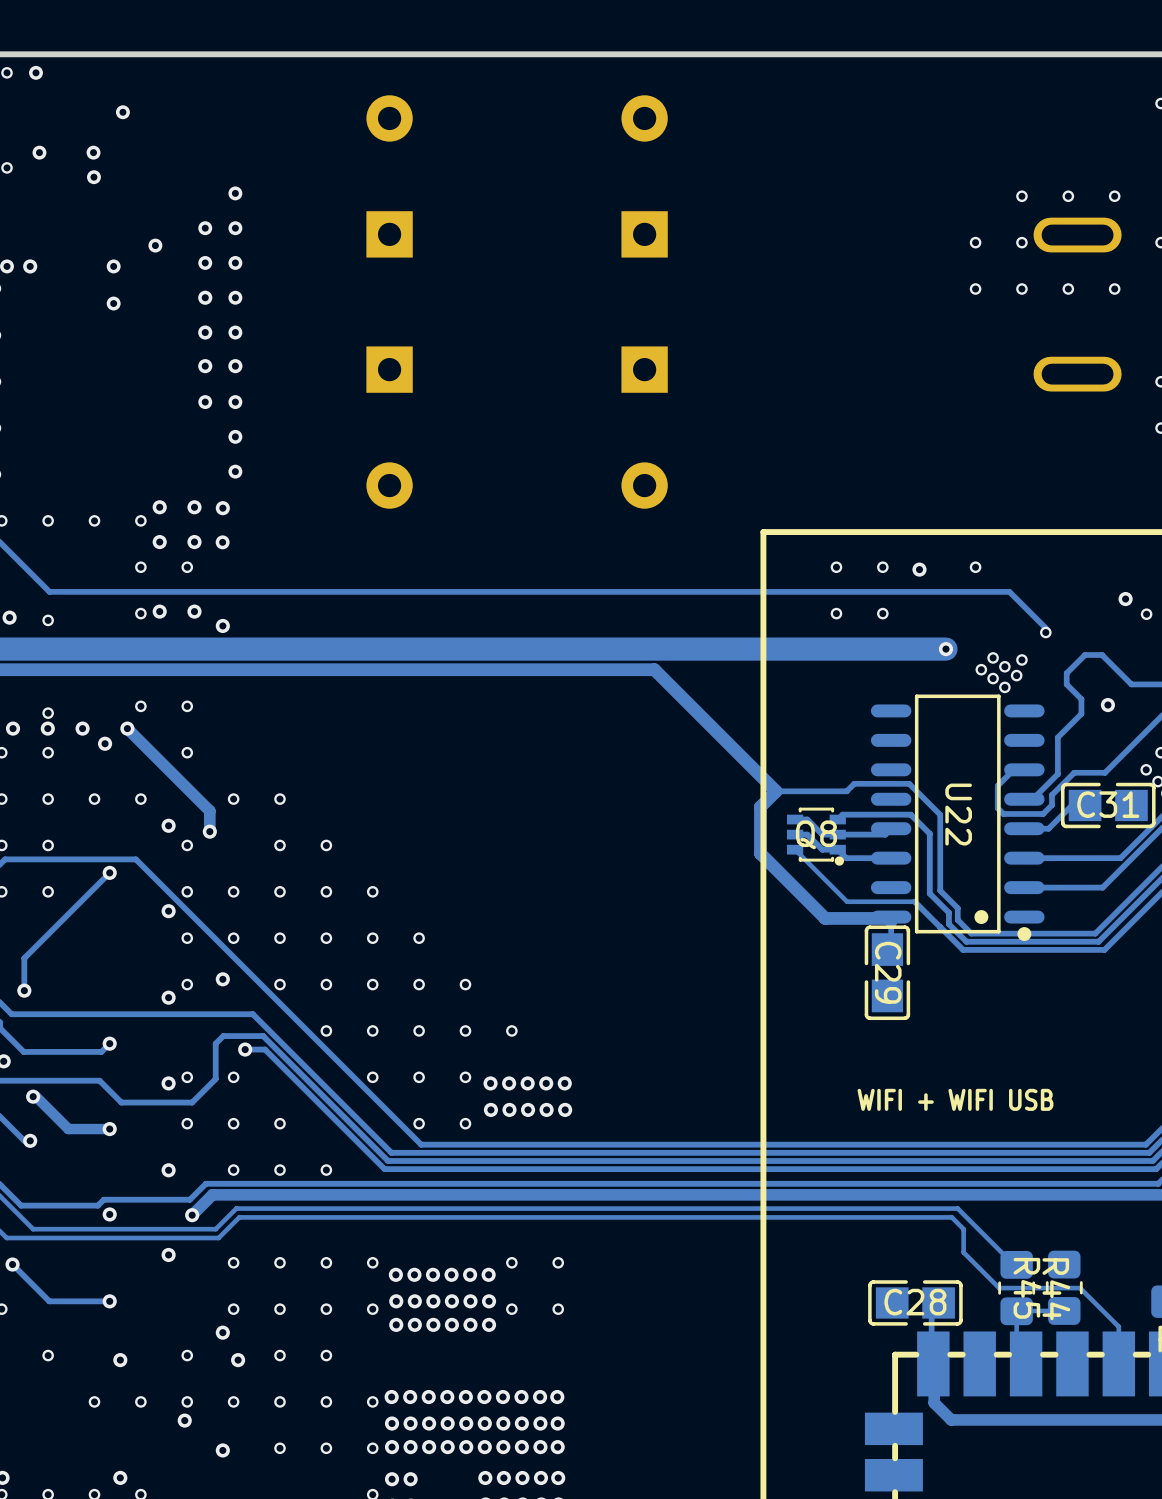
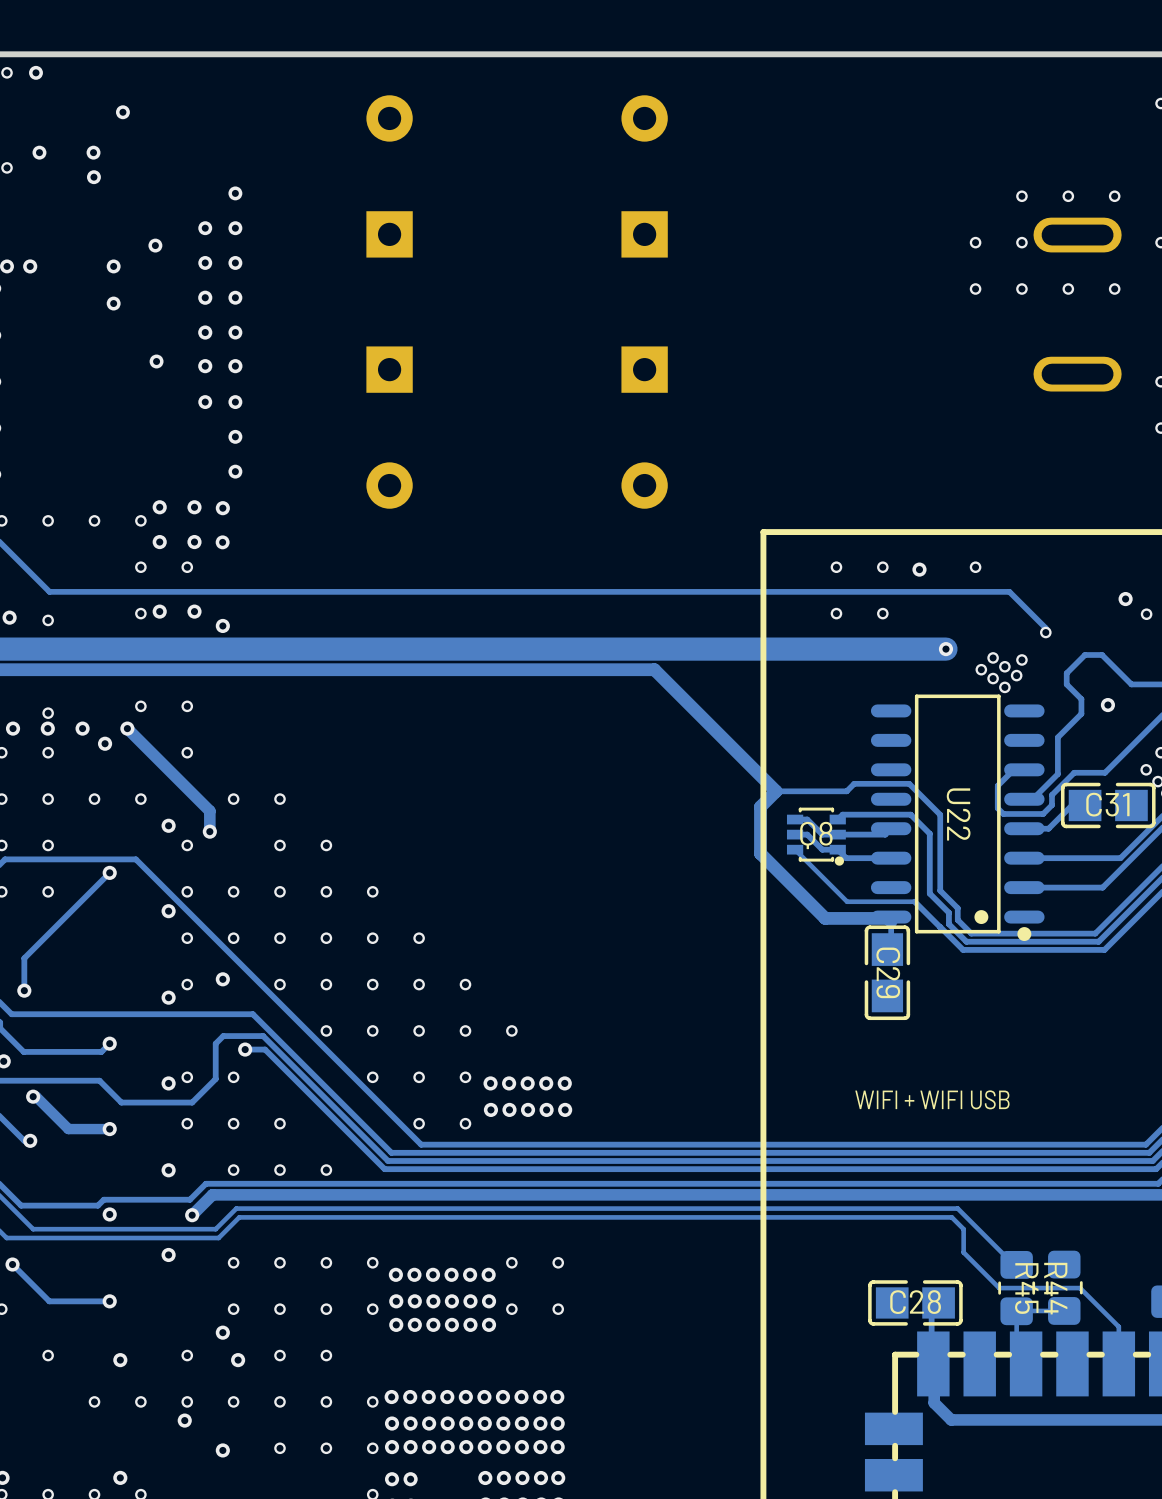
via: none -> (156, 361)

